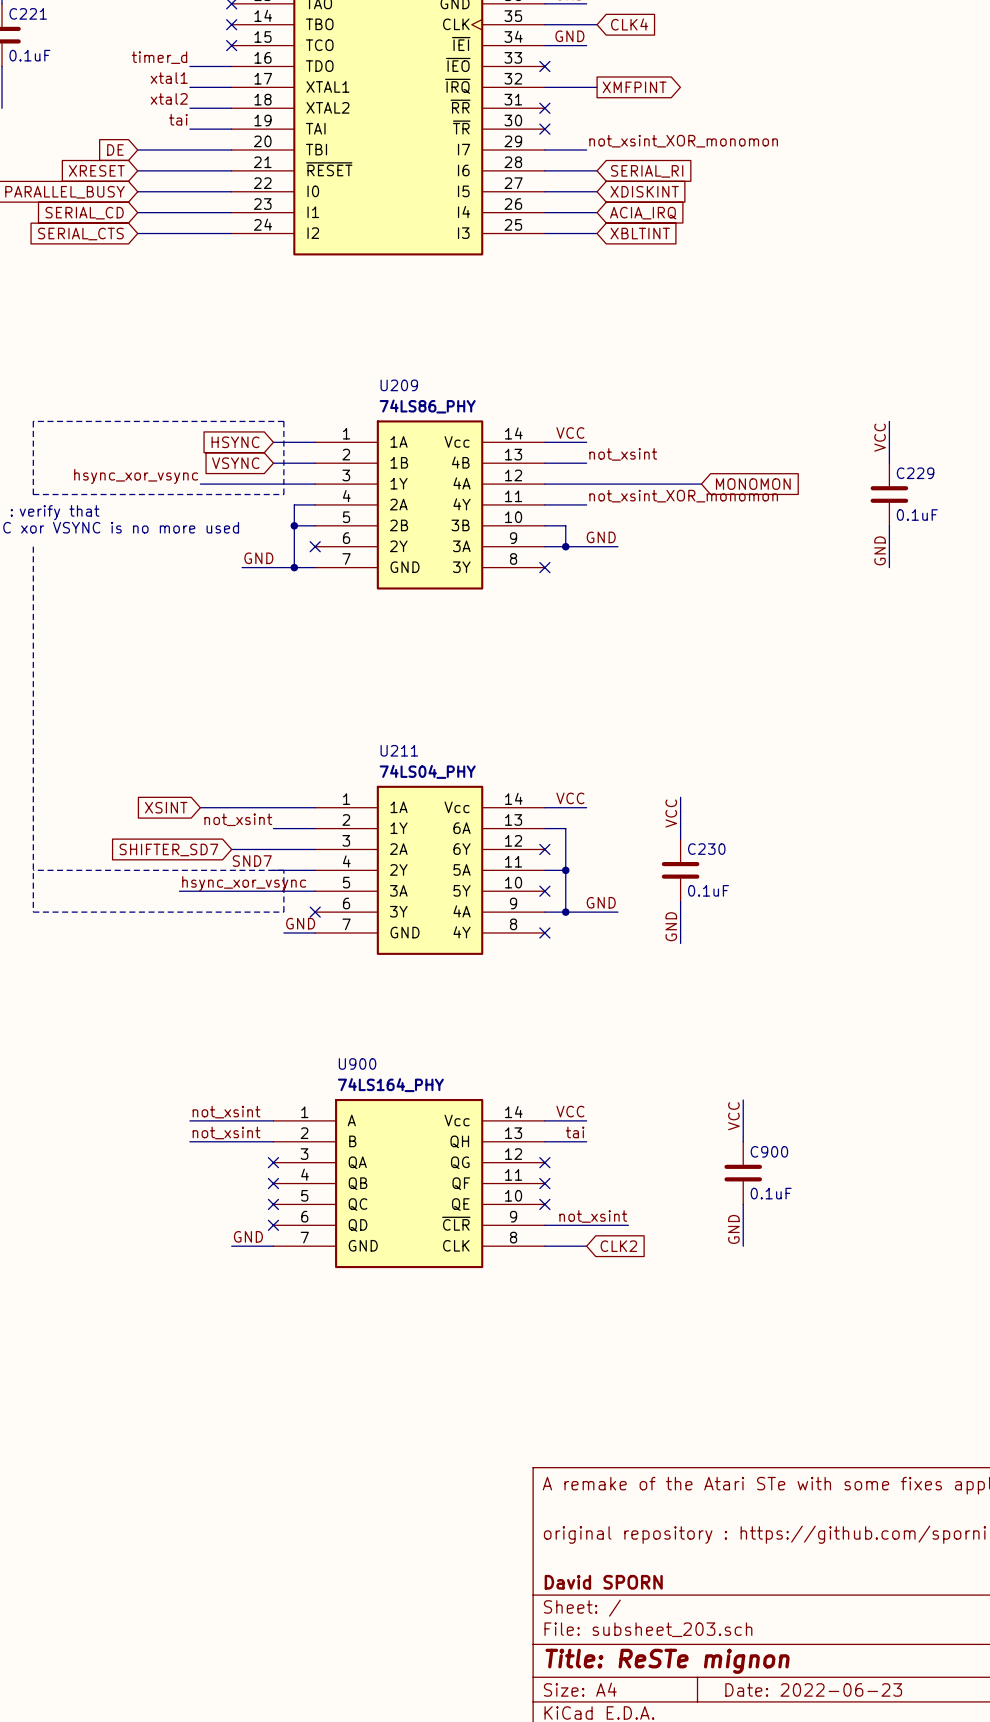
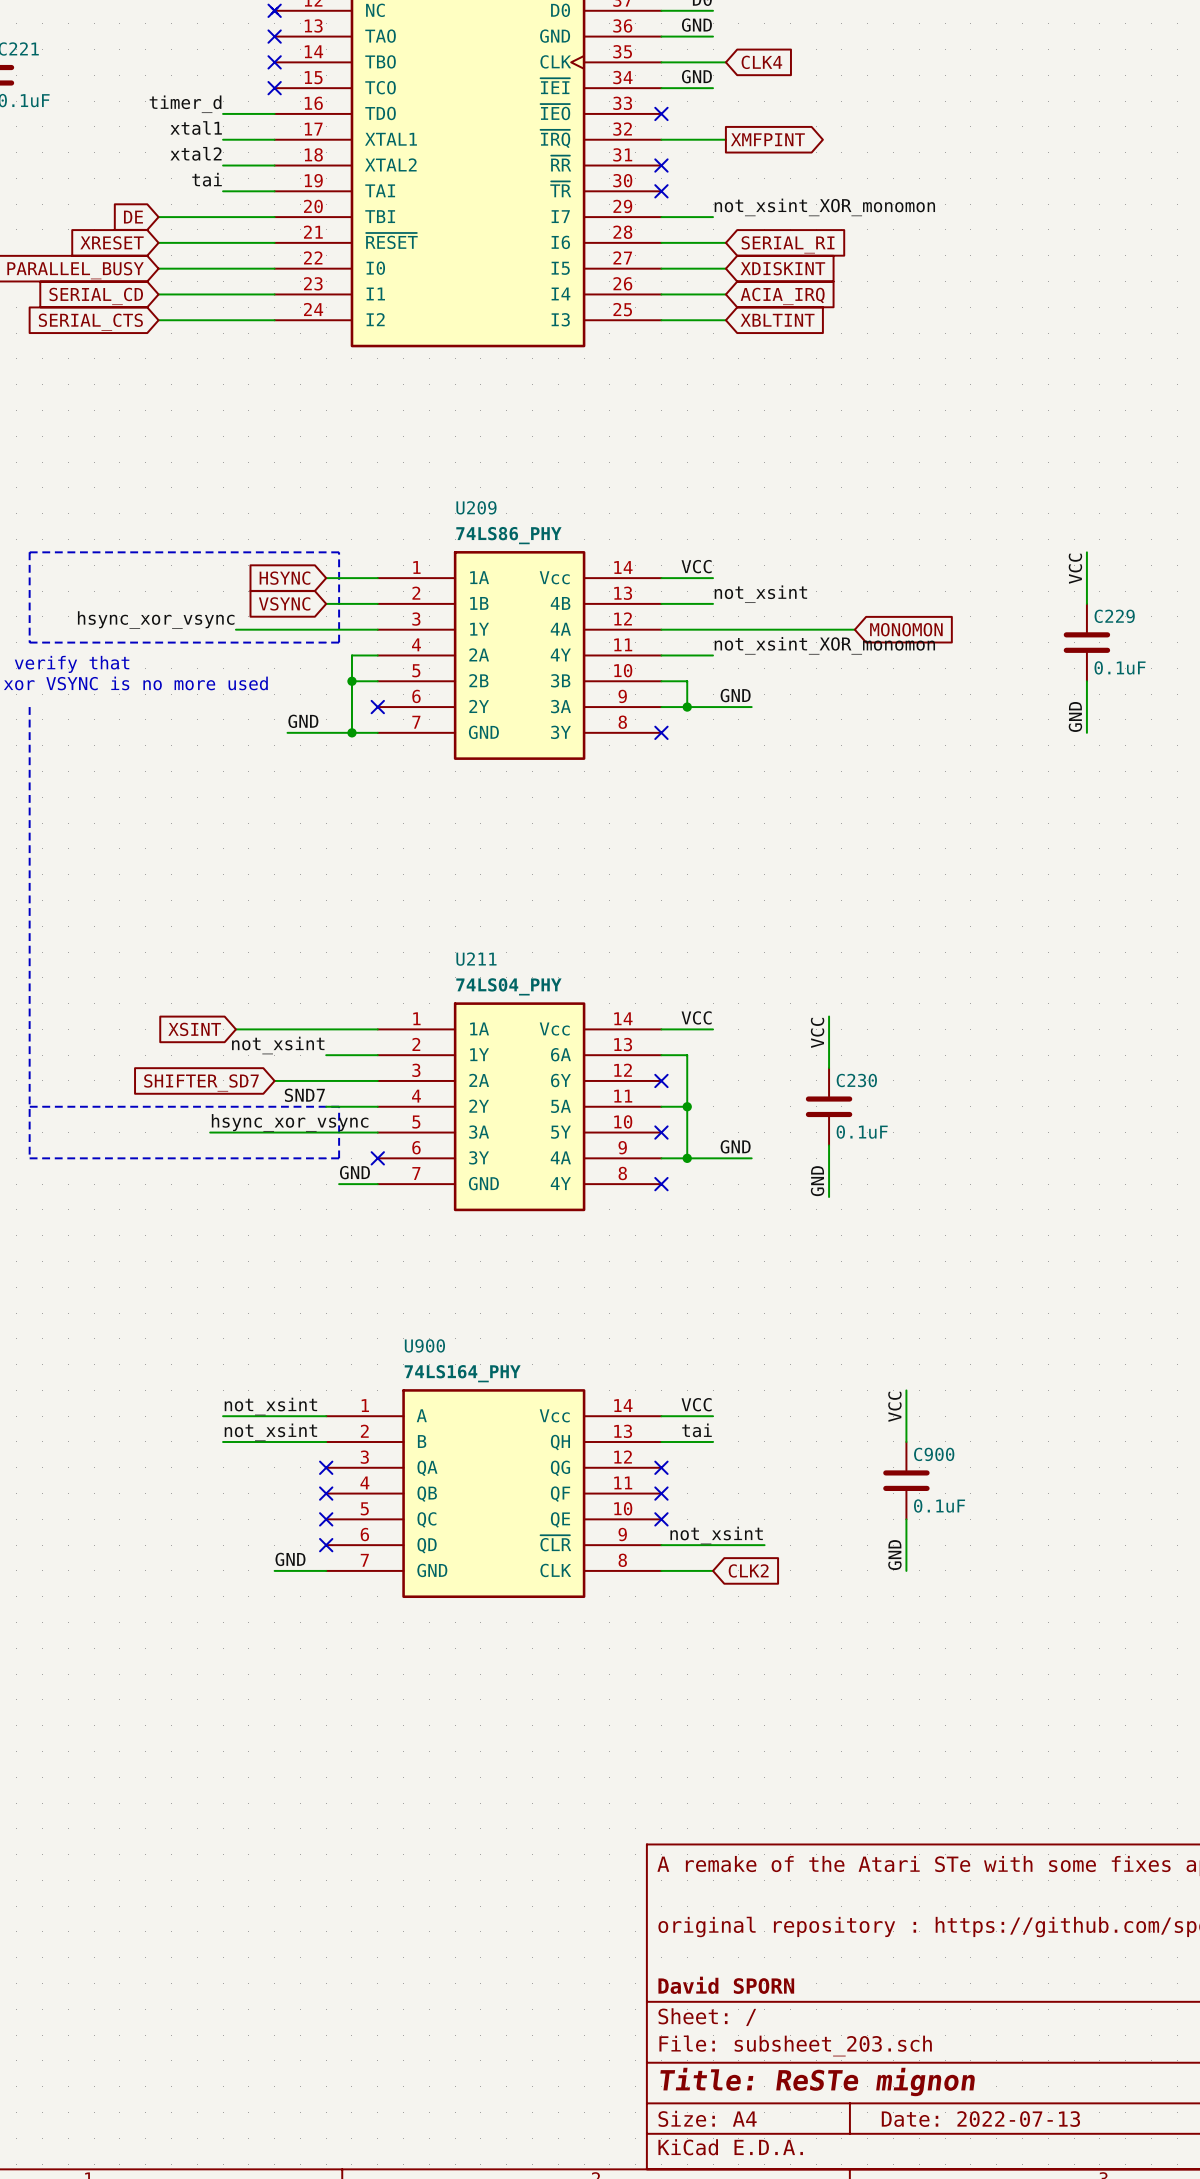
title block: Date: 2022-06-23 (813, 1689) -> Date: 2022-07-13 (980, 2119)

